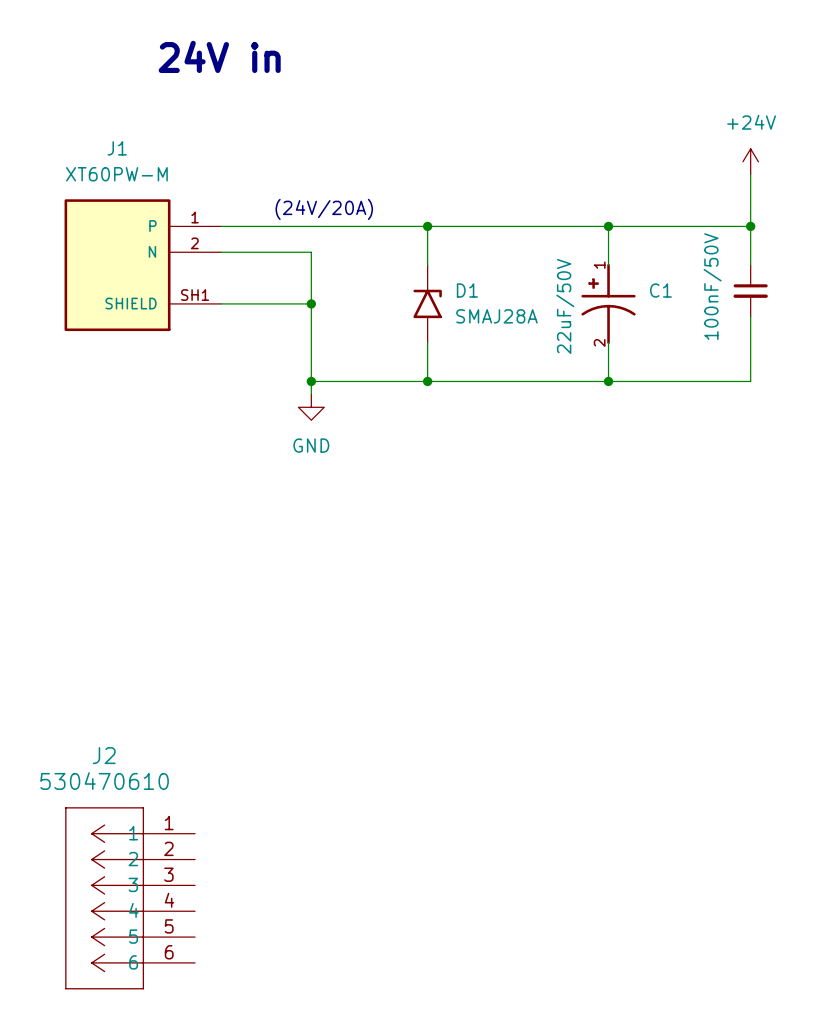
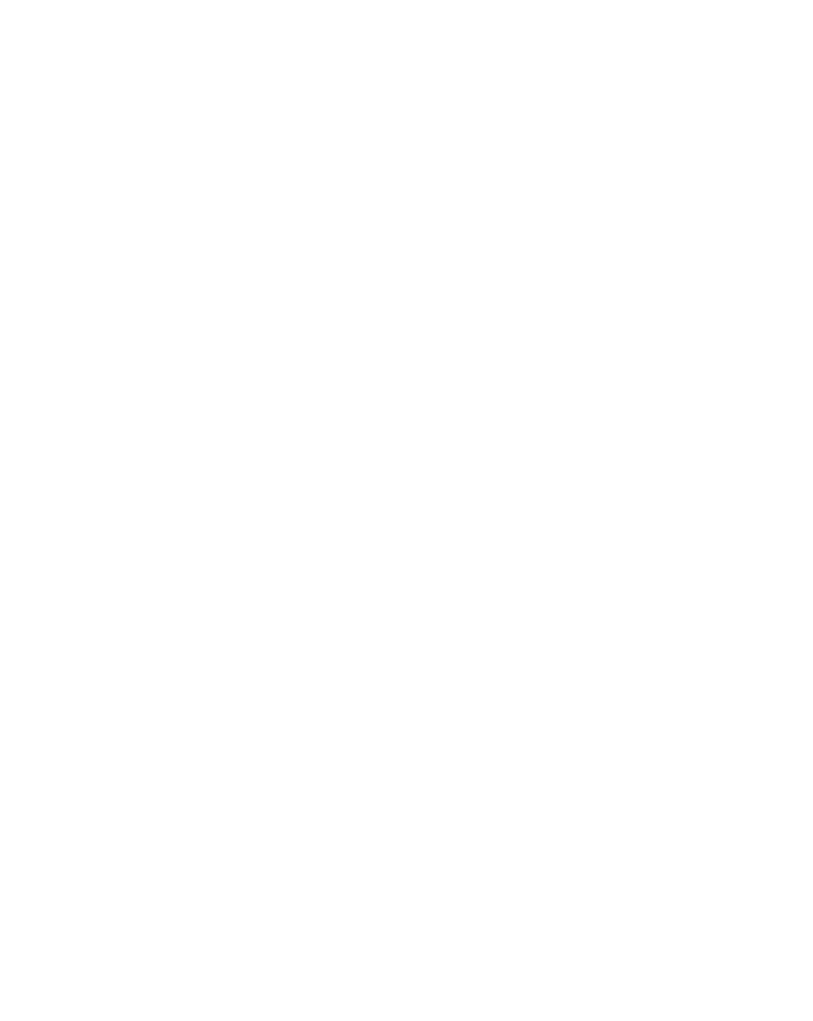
text: 24V in (219, 56) -> none
power symbol: +24V (750, 161) -> none
wire: (750, 174) (750, 265) -> none
text: (24V/20A) (324, 209) -> none
wire: (220, 226) (750, 226) -> none
wire: (427, 226) (427, 265) -> none
junction: (427, 226) -> none
wire: (608, 226) (608, 265) -> none
junction: (608, 226) -> none
junction: (750, 226) -> none
wire: (220, 252) (311, 252) (311, 394) -> none
J1: XT60PW-M (142, 265) -> none
part: 100nF/50V (750, 291) -> none
wire: (220, 303) (311, 303) -> none
junction: (311, 303) -> none
D1: SMAJ28A (427, 303) -> none
C1: 22uF/50V (608, 303) -> none
wire: (750, 316) (750, 381) (311, 381) -> none
wire: (427, 342) (427, 381) -> none
wire: (608, 342) (608, 381) -> none
junction: (311, 381) -> none
junction: (427, 381) -> none
junction: (608, 381) -> none
power symbol: GND (311, 407) -> none
J2: 530470610 (130, 898) -> none

